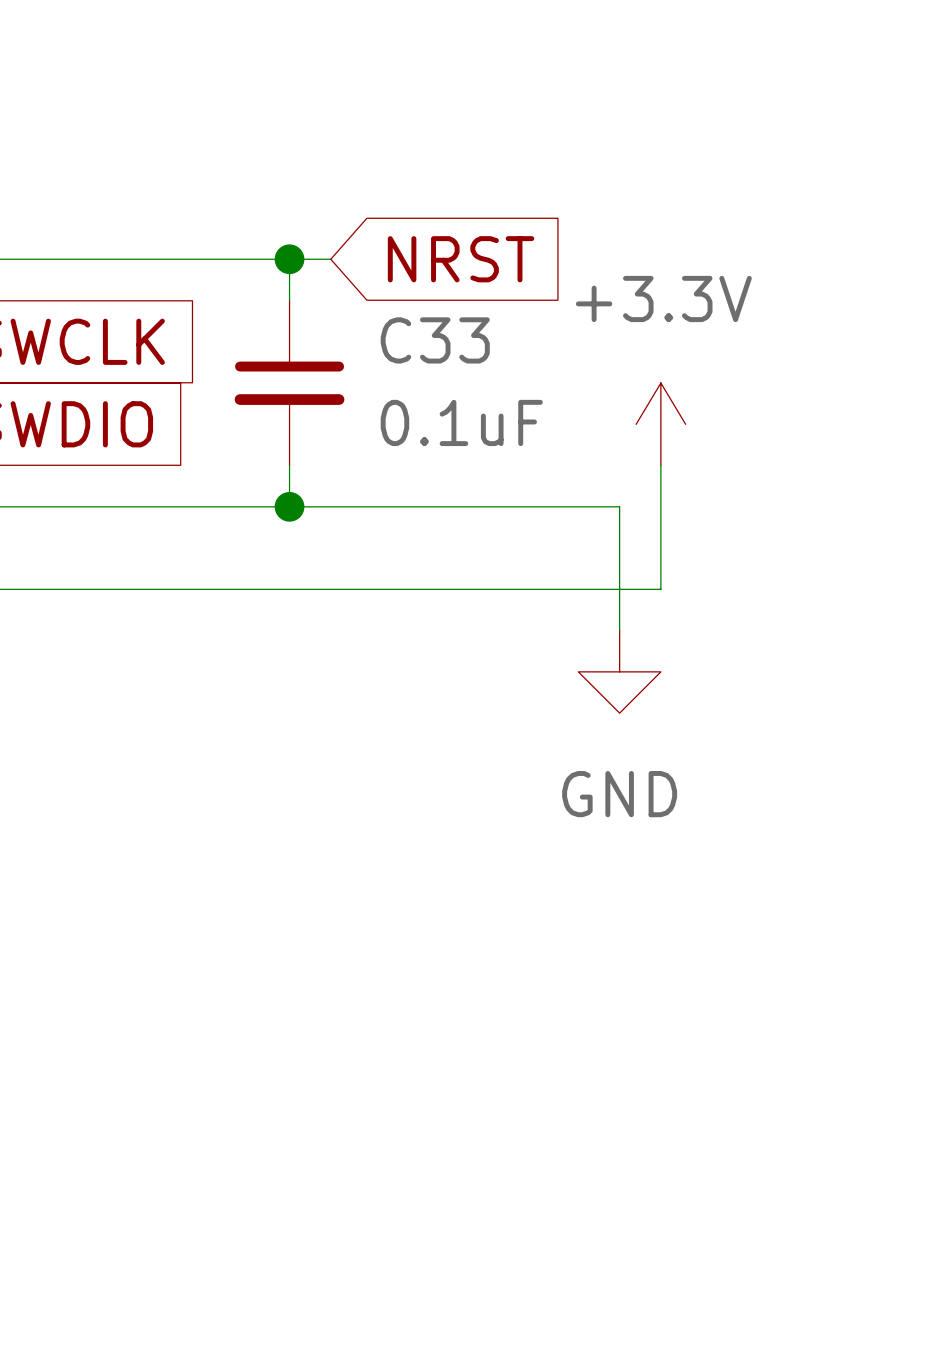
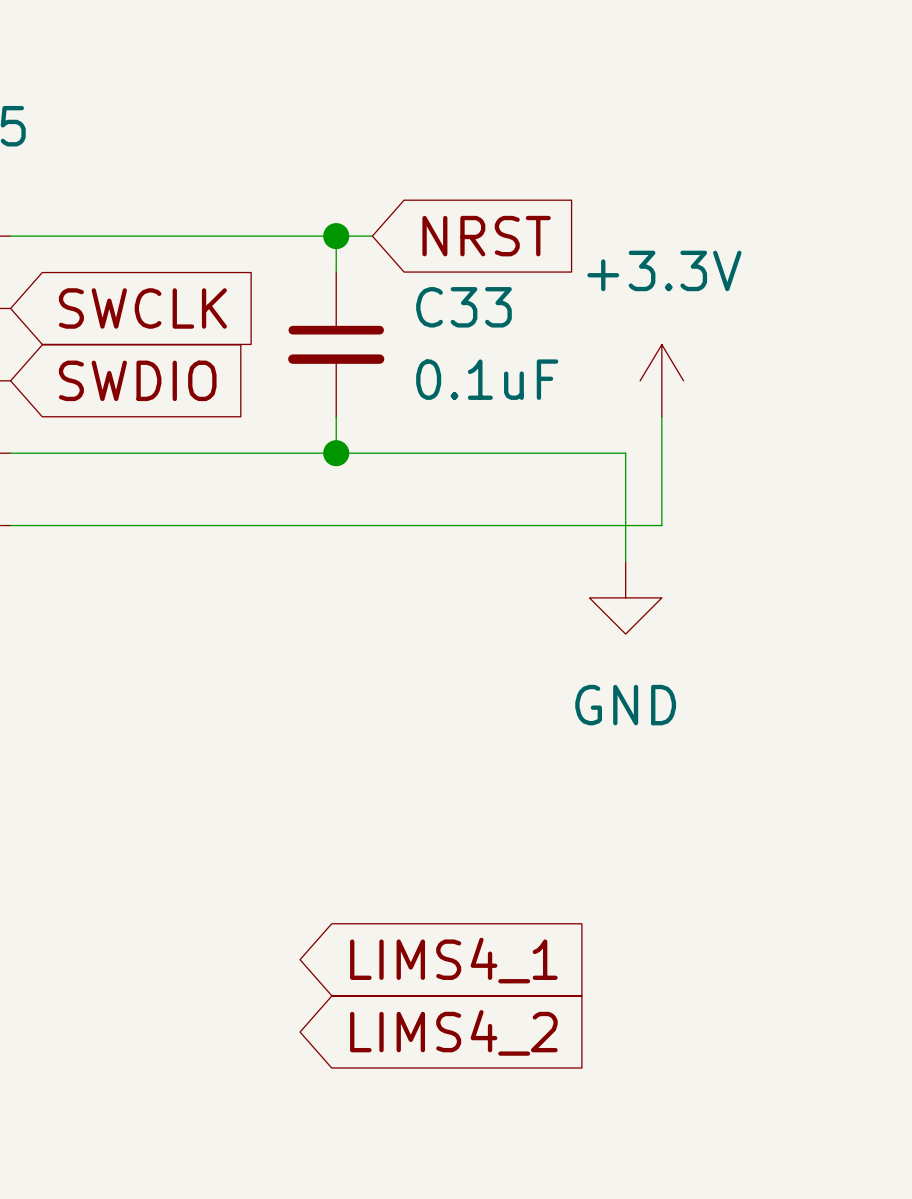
global label: none -> LIMS4_1 (453, 960)
global label: none -> LIMS4_2 (453, 1032)

